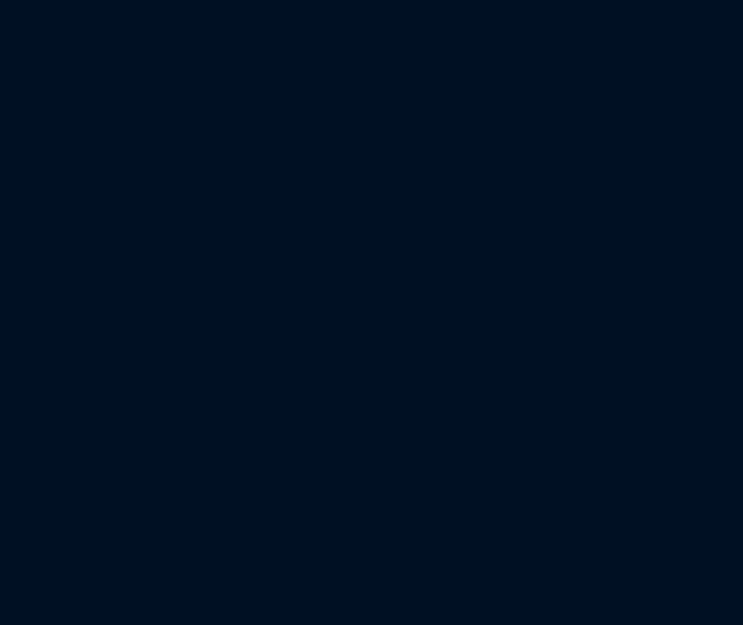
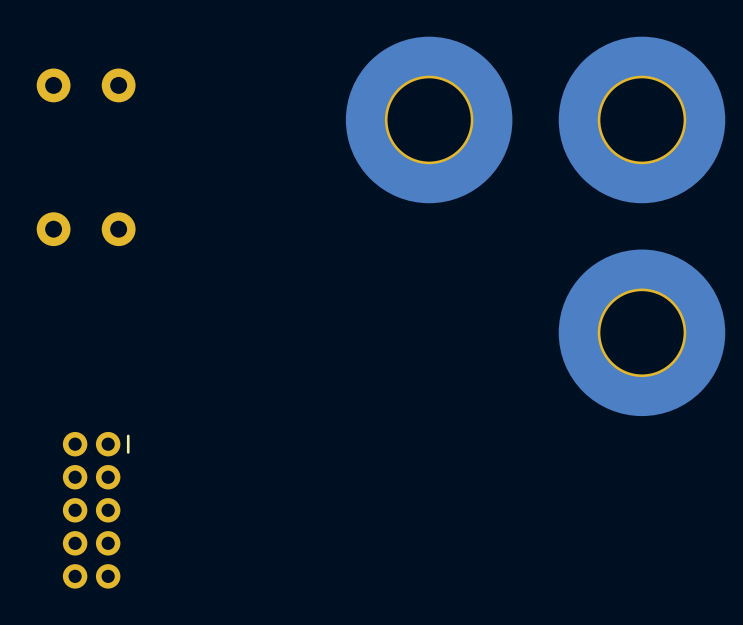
part: none -> (86, 85)
part: none -> (429, 119)
part: none -> (641, 119)
part: none -> (86, 229)
part: none -> (641, 332)
part: none -> (96, 510)

